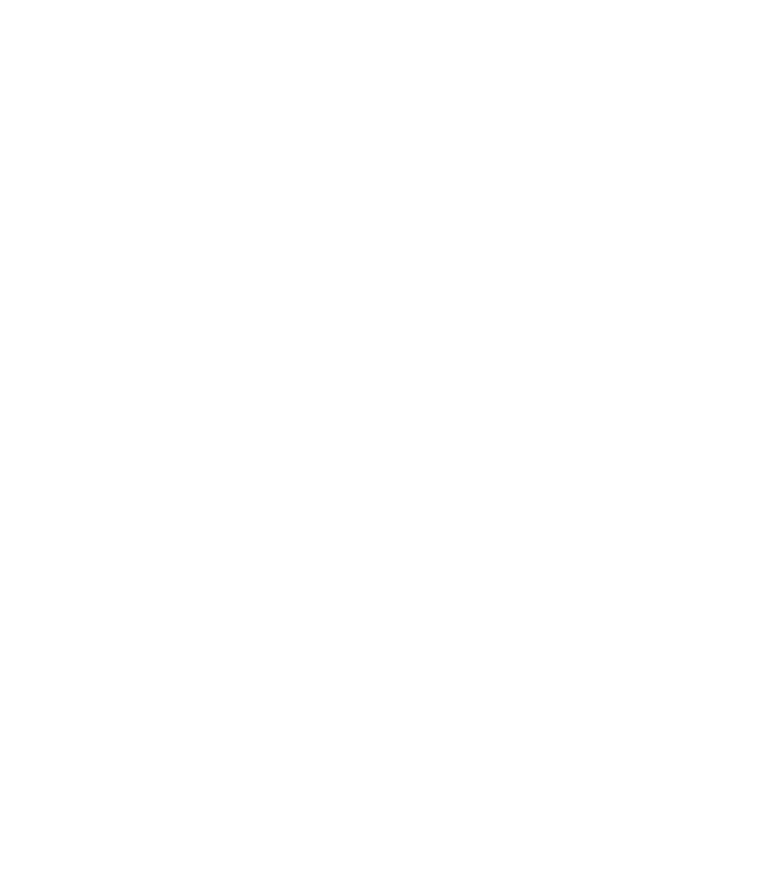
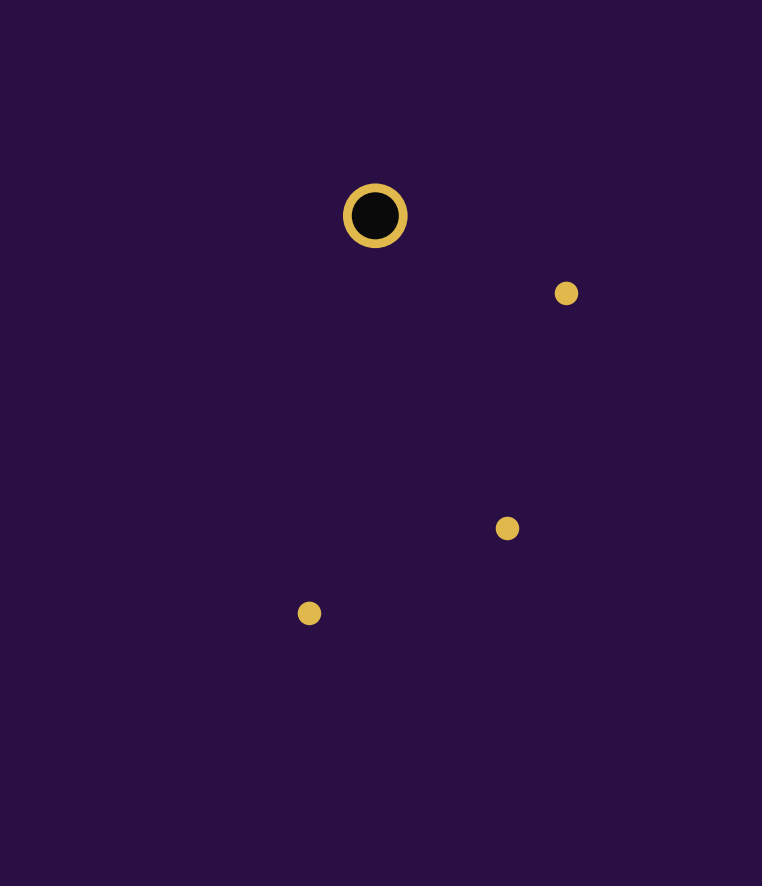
part: none -> (375, 215)
part: none -> (566, 293)
part: none -> (507, 528)
part: none -> (309, 613)

